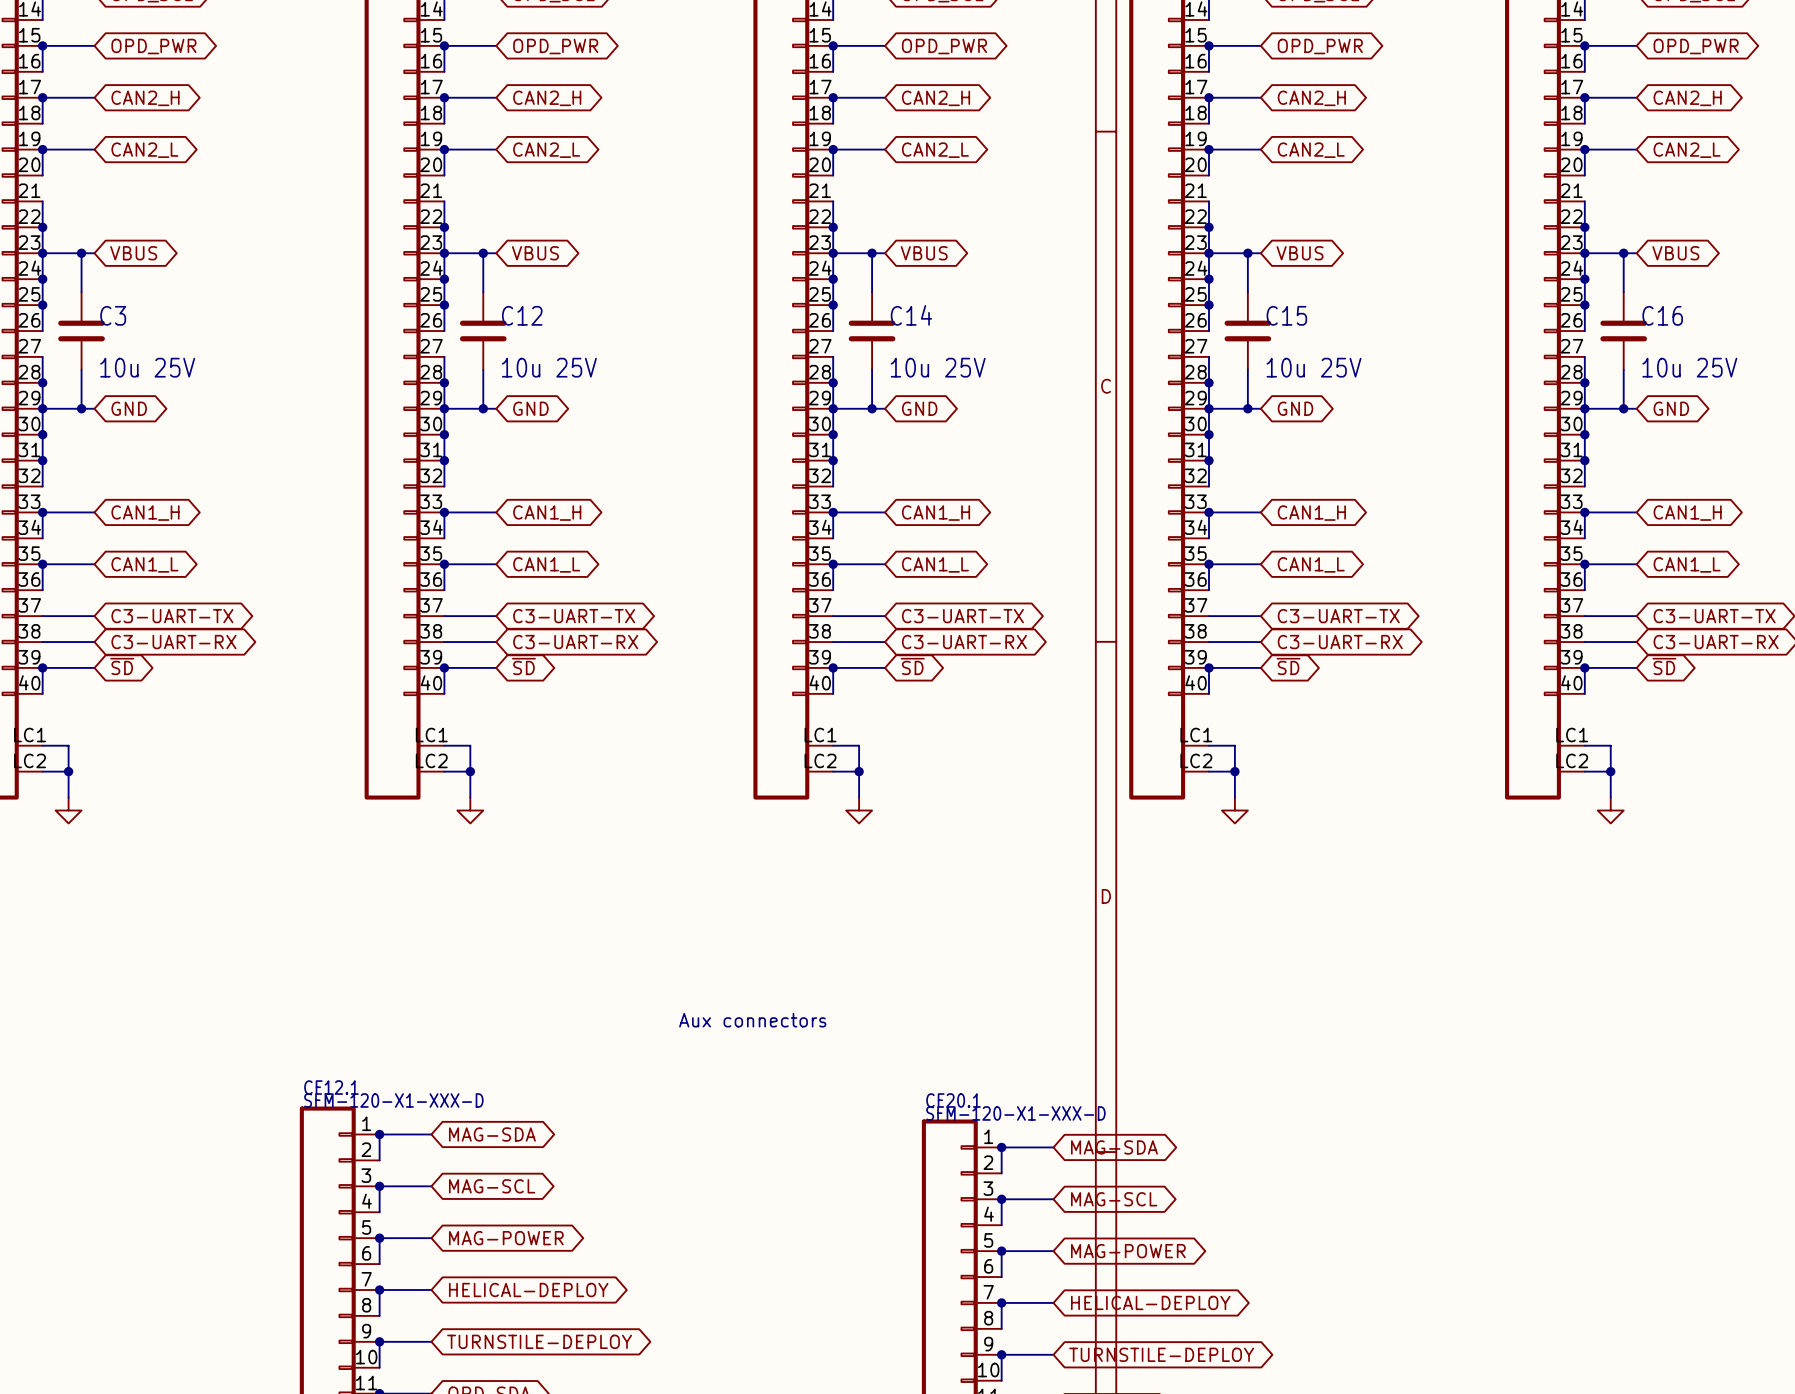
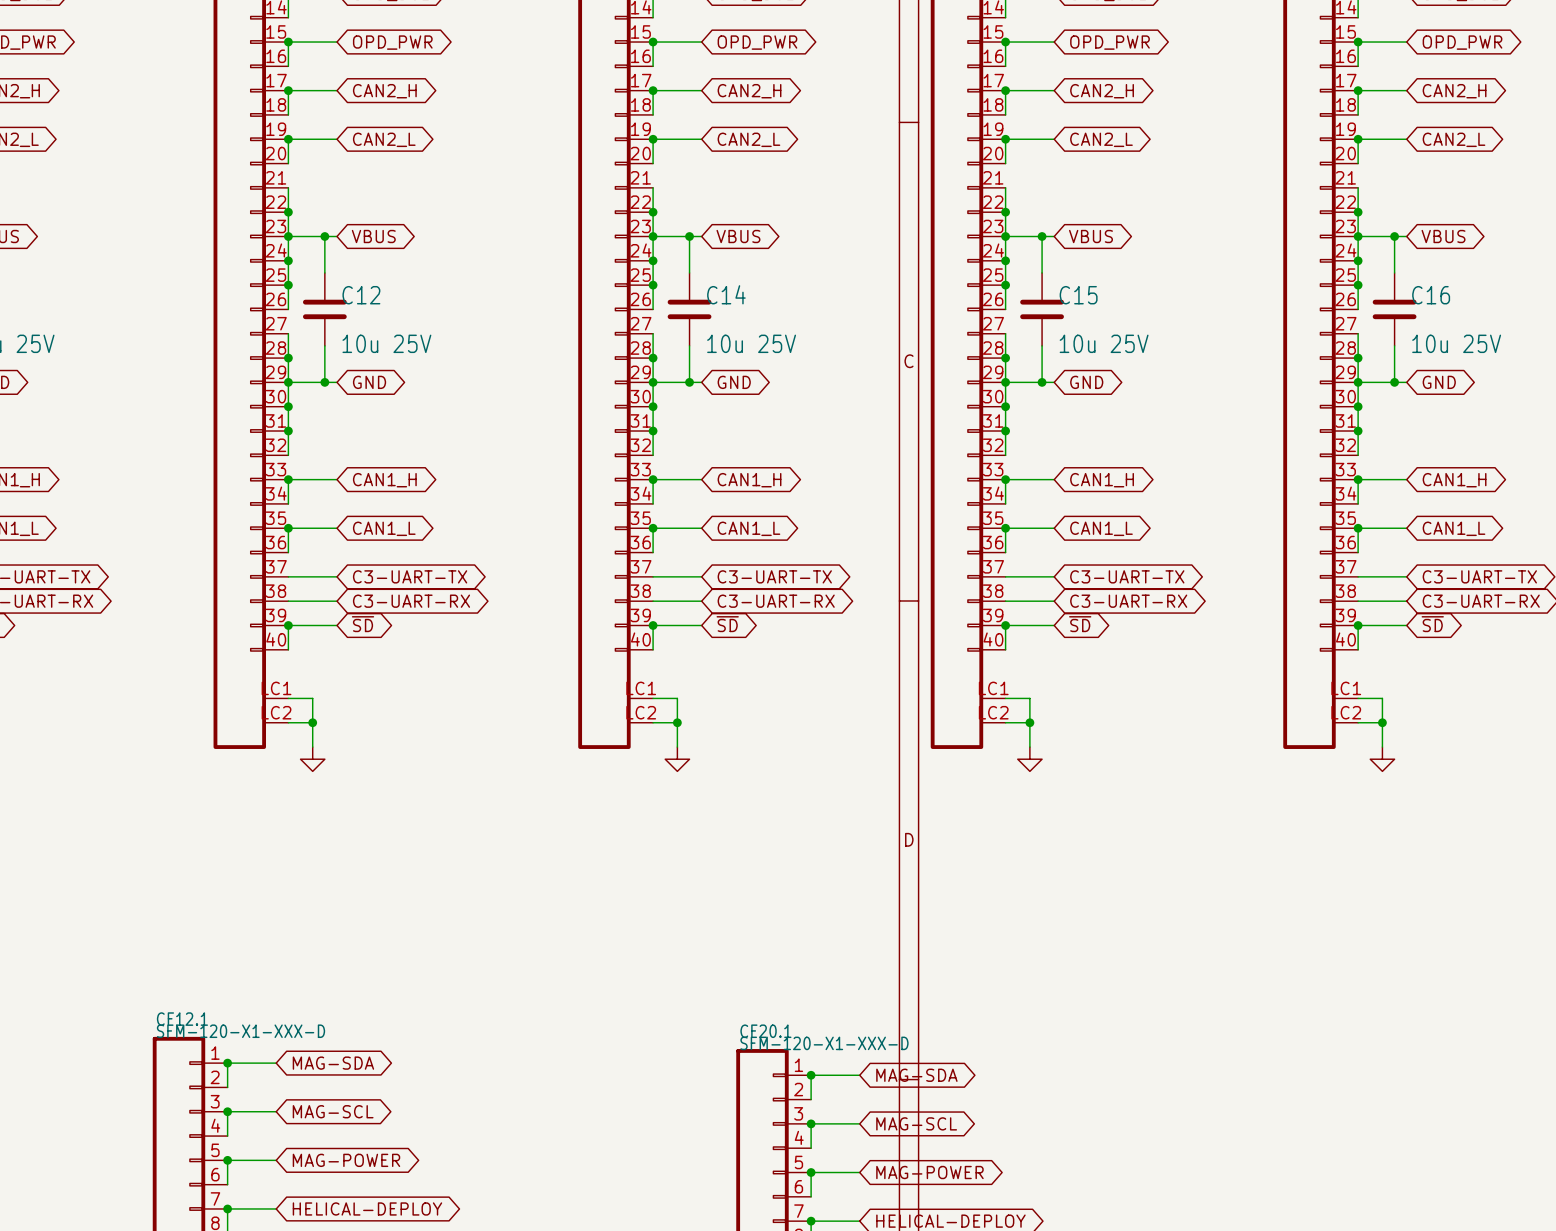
text: Aux connectors (752, 1020) -> none

